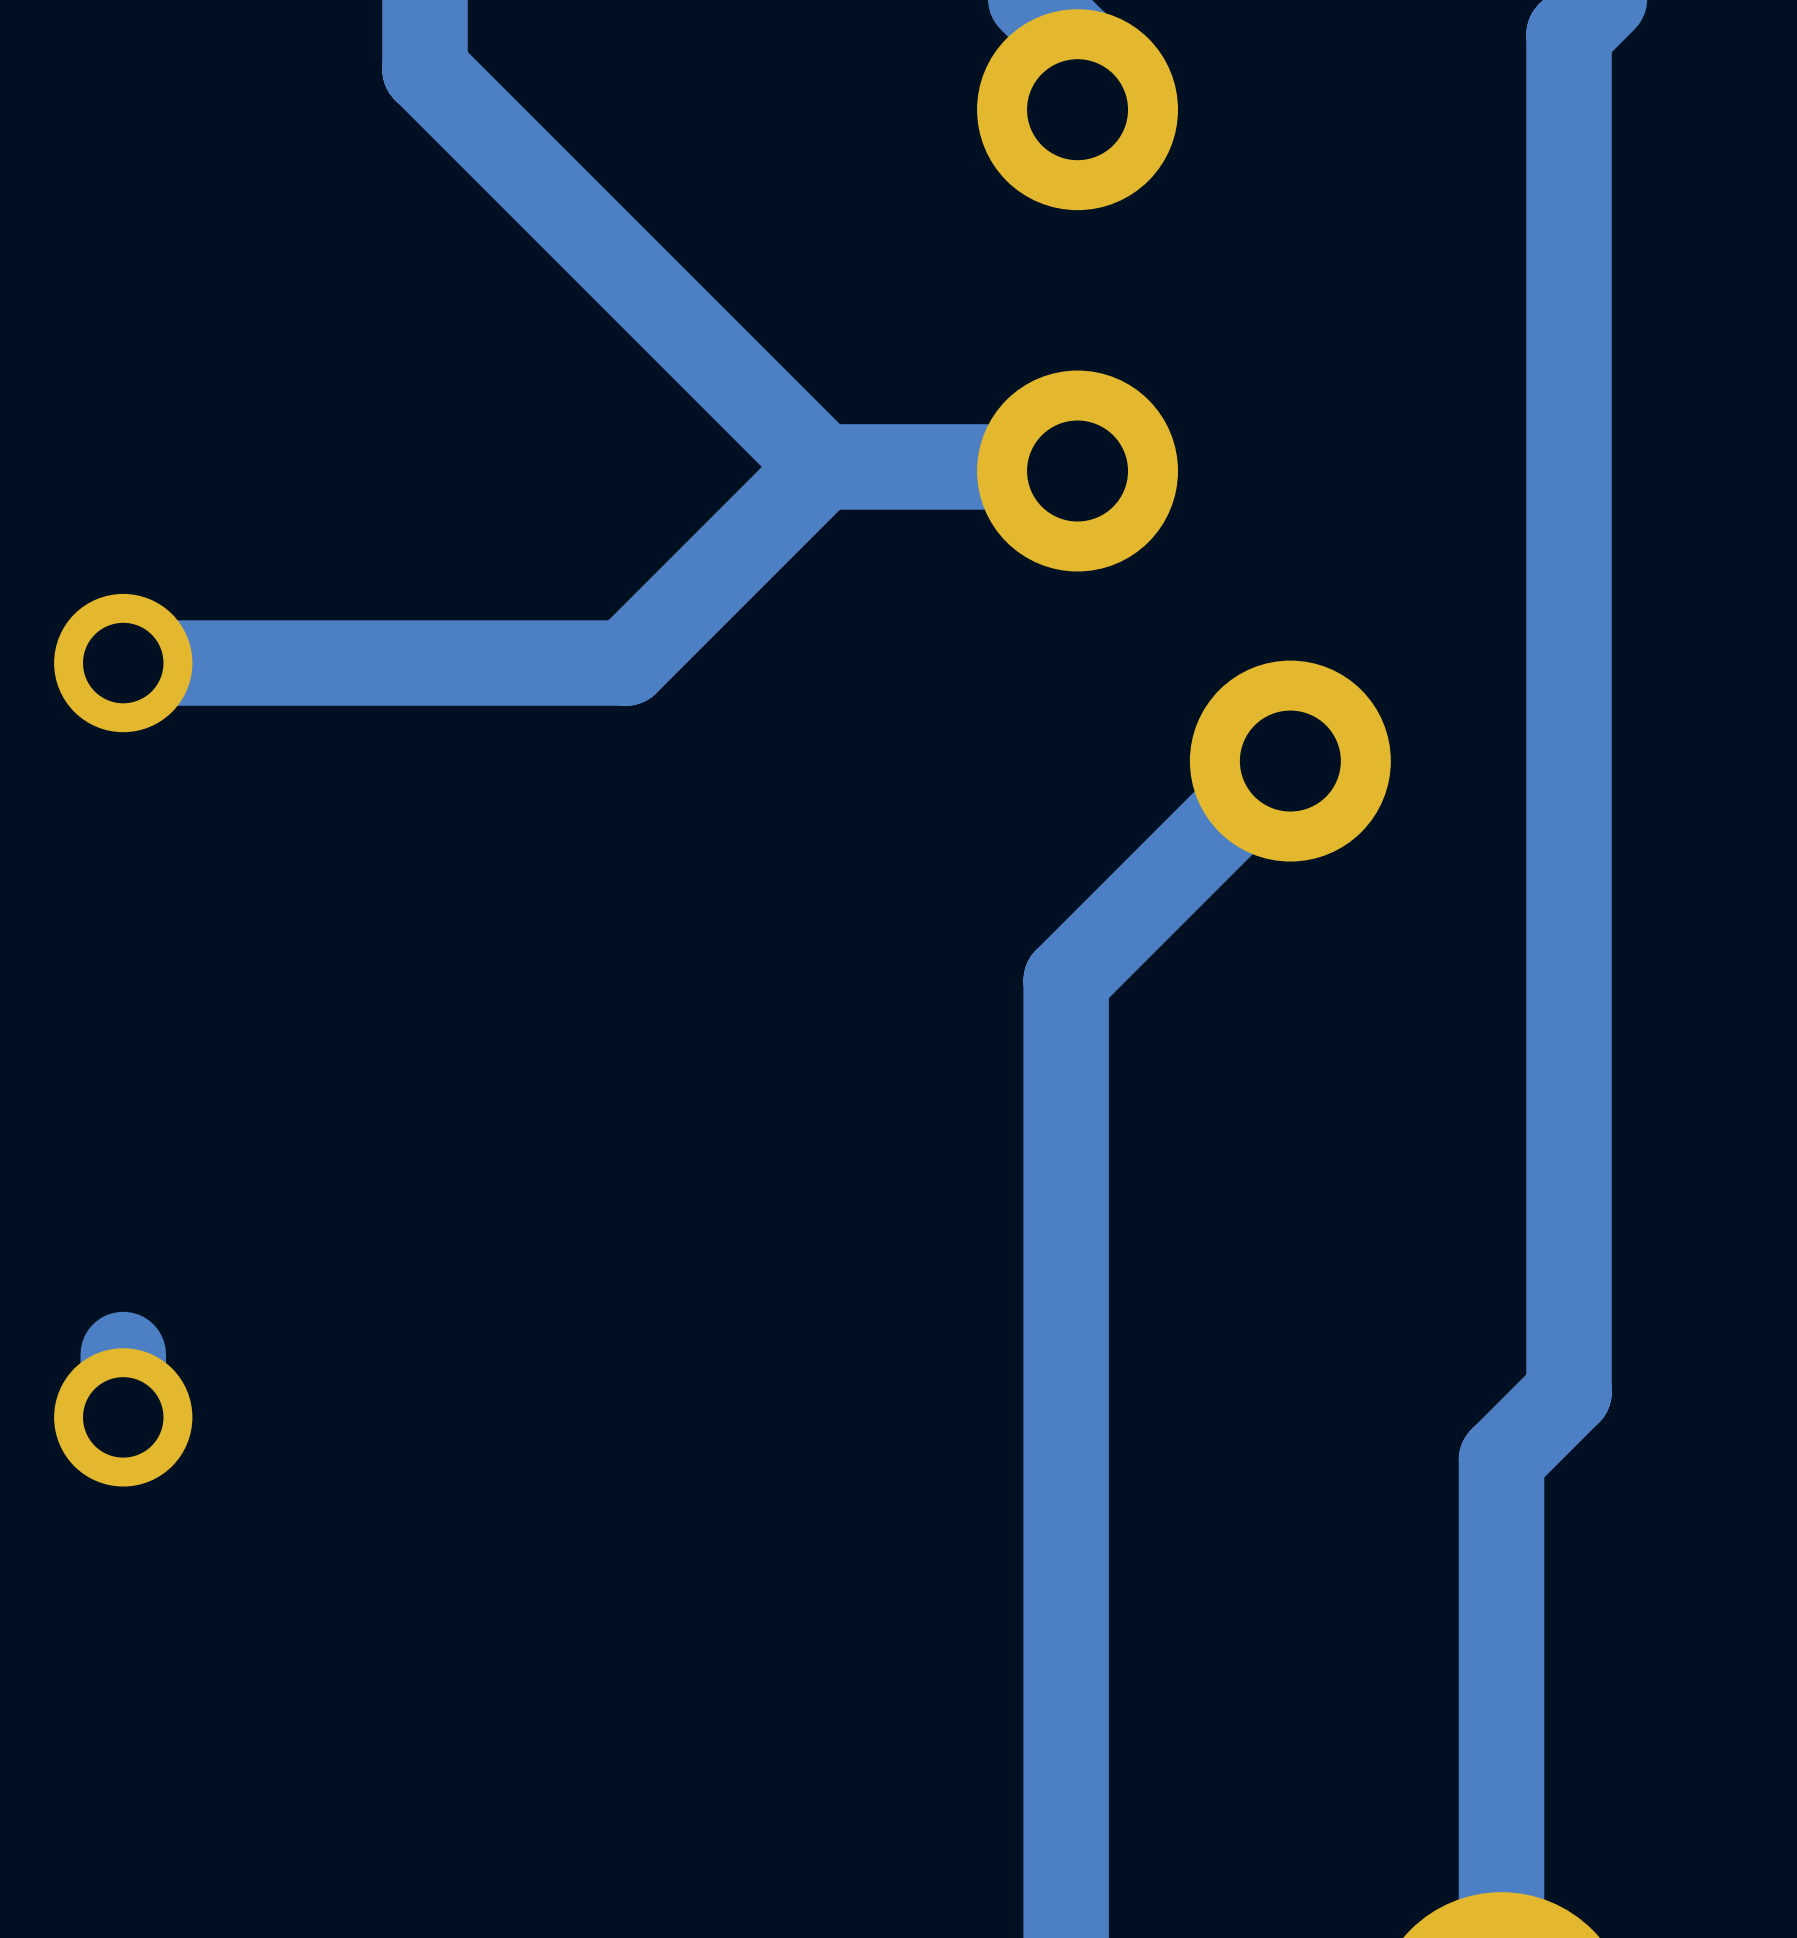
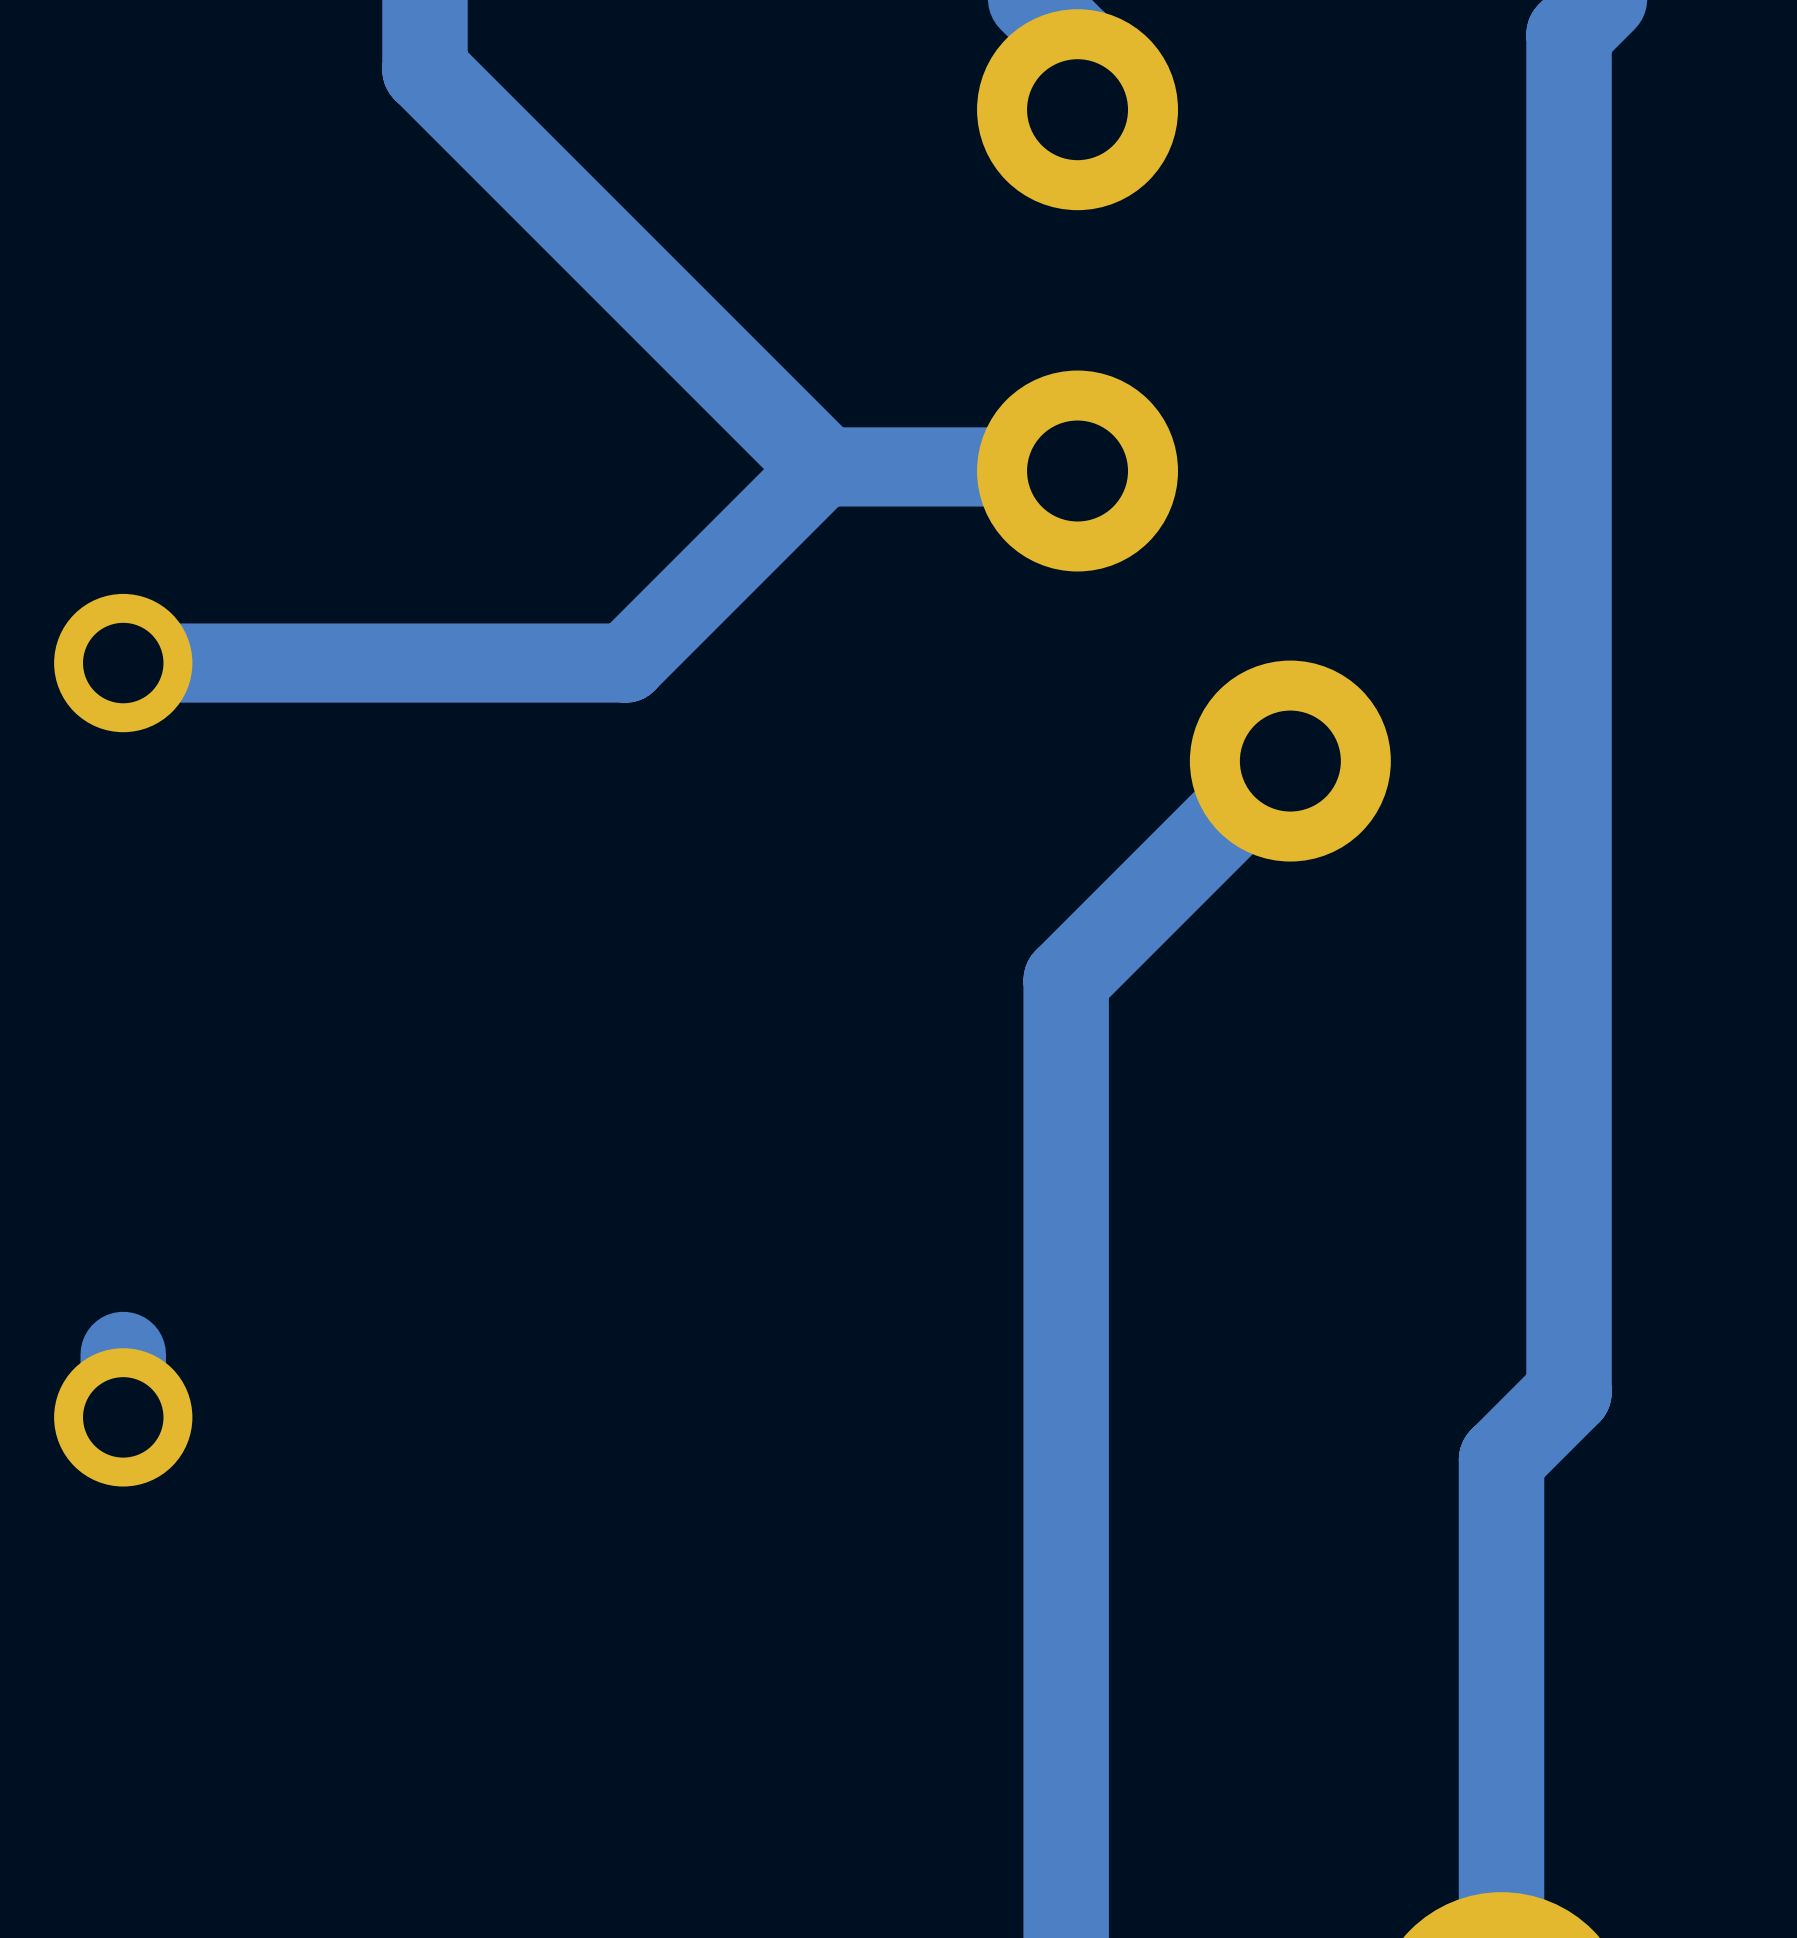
bottom track width: thick (1076, 466) (822, 466) (626, 663) (123, 663) -> thin (1076, 466) (822, 466) (626, 663) (123, 663)

